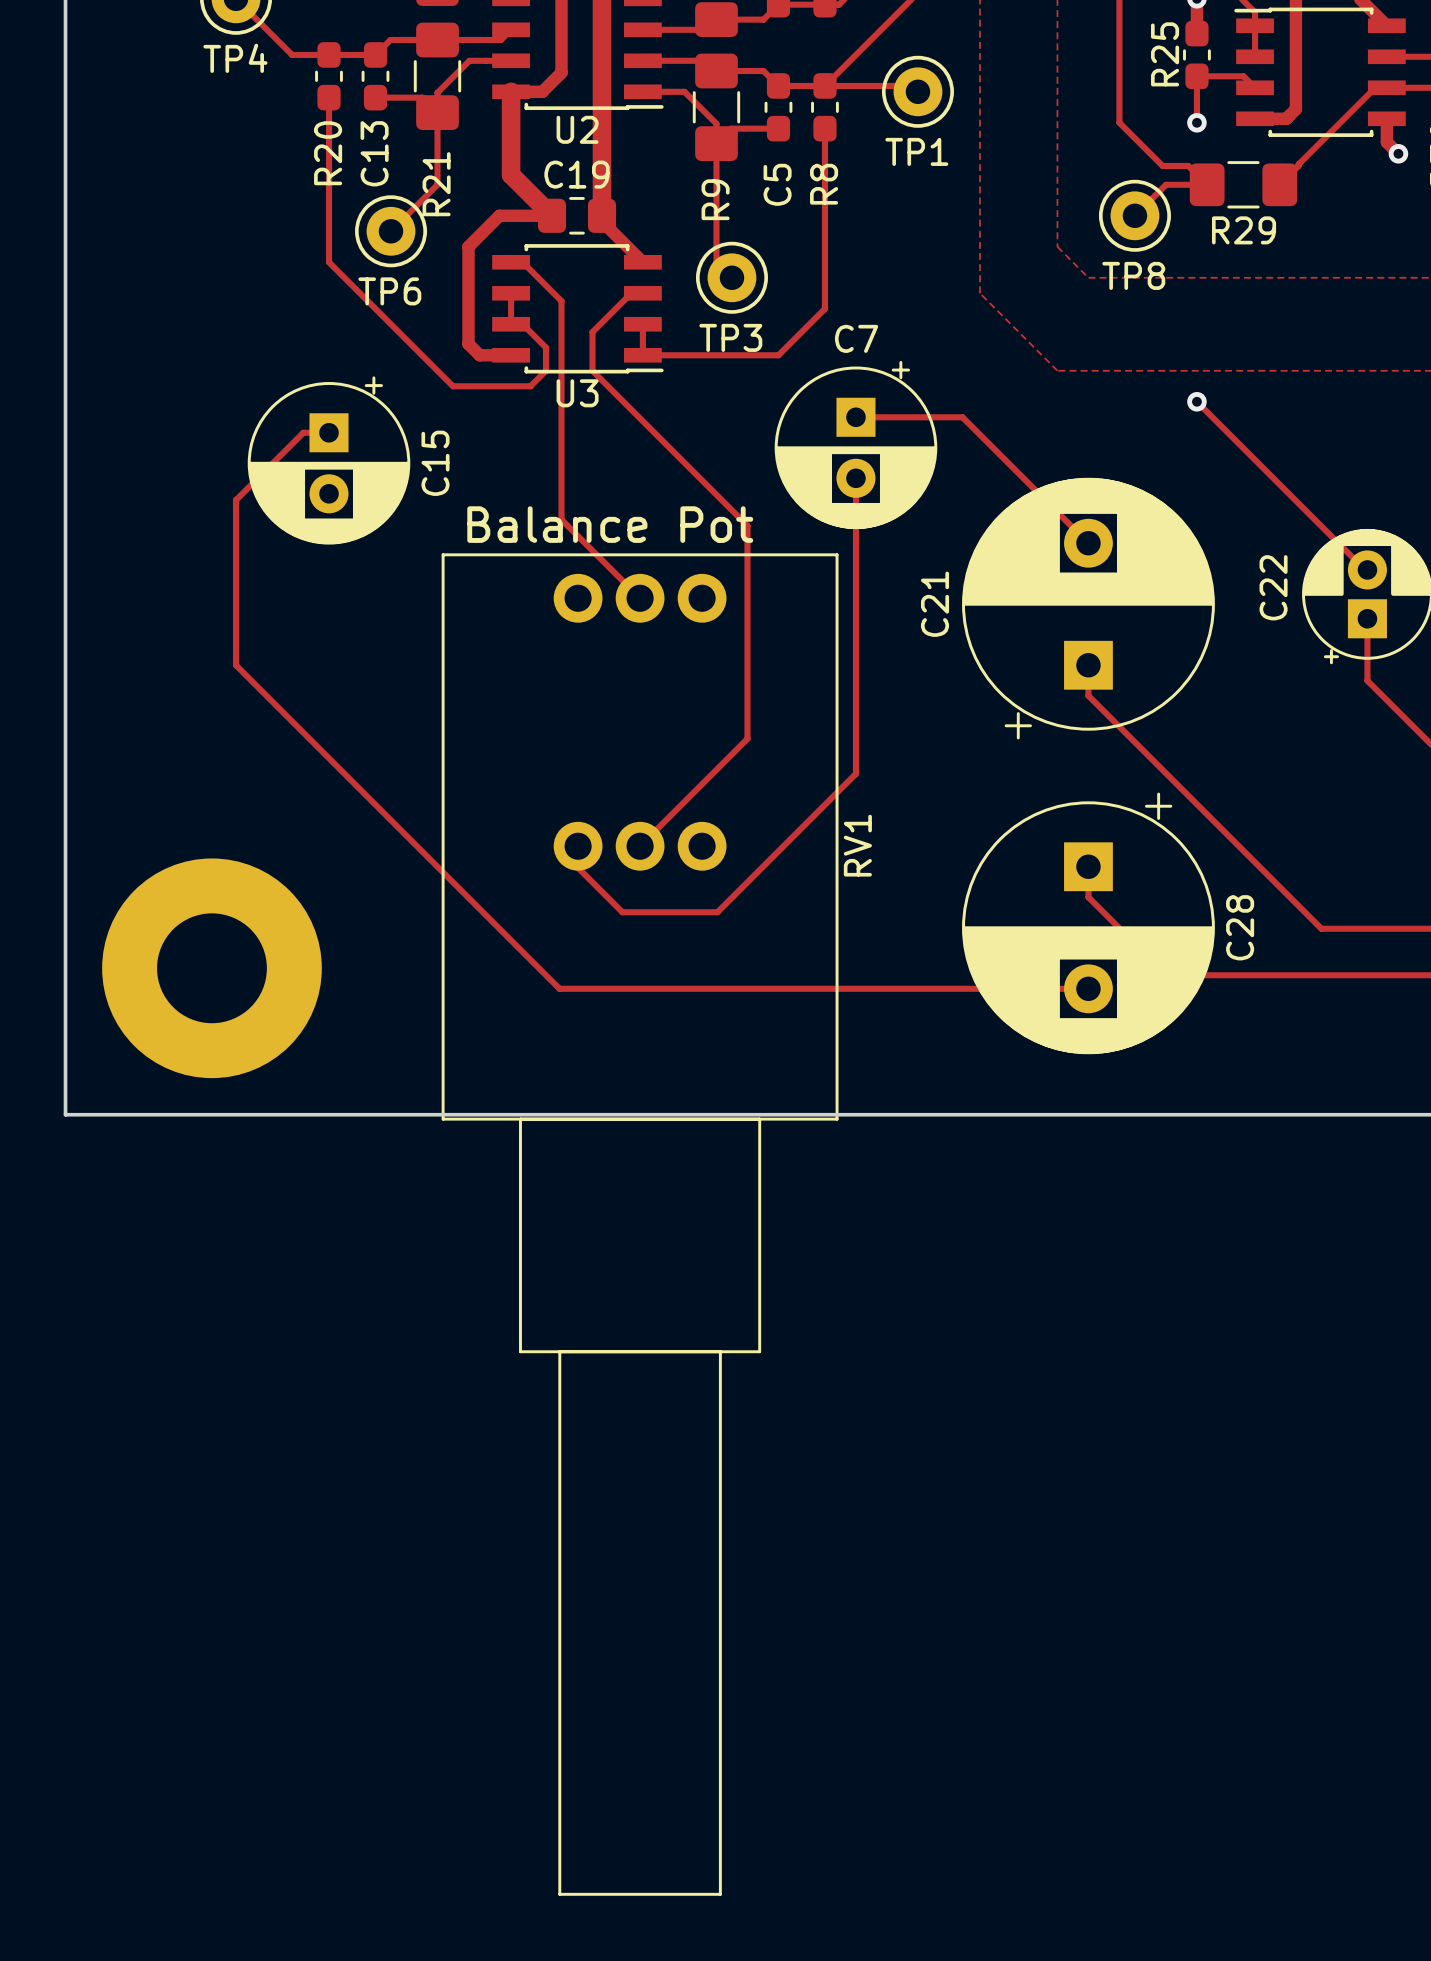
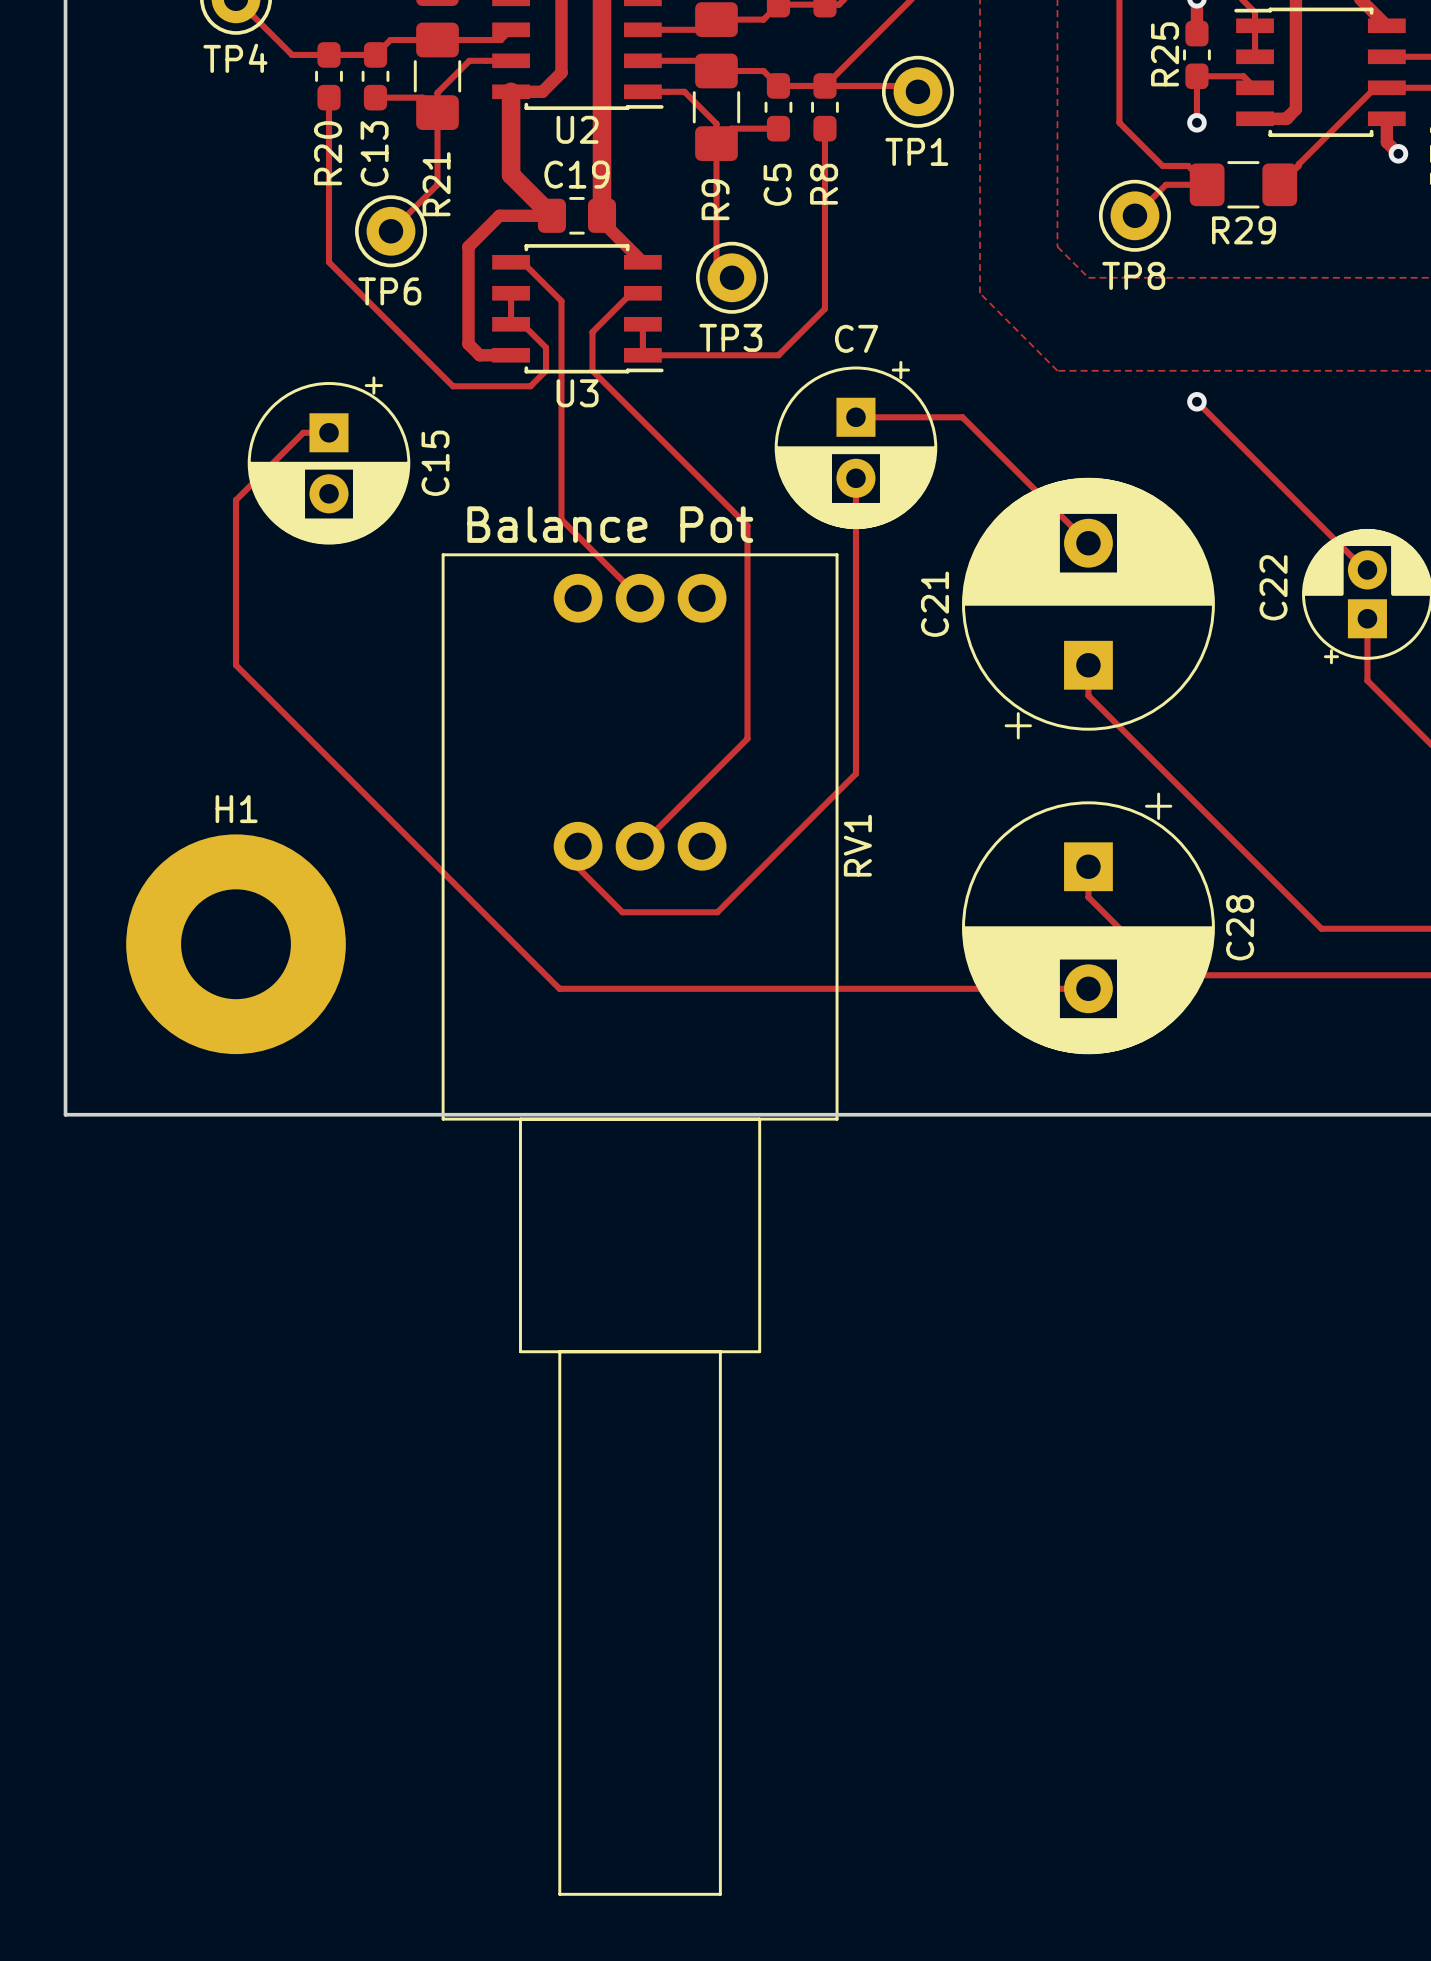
H1: none -> (236, 944)
part: (211, 968) -> none

